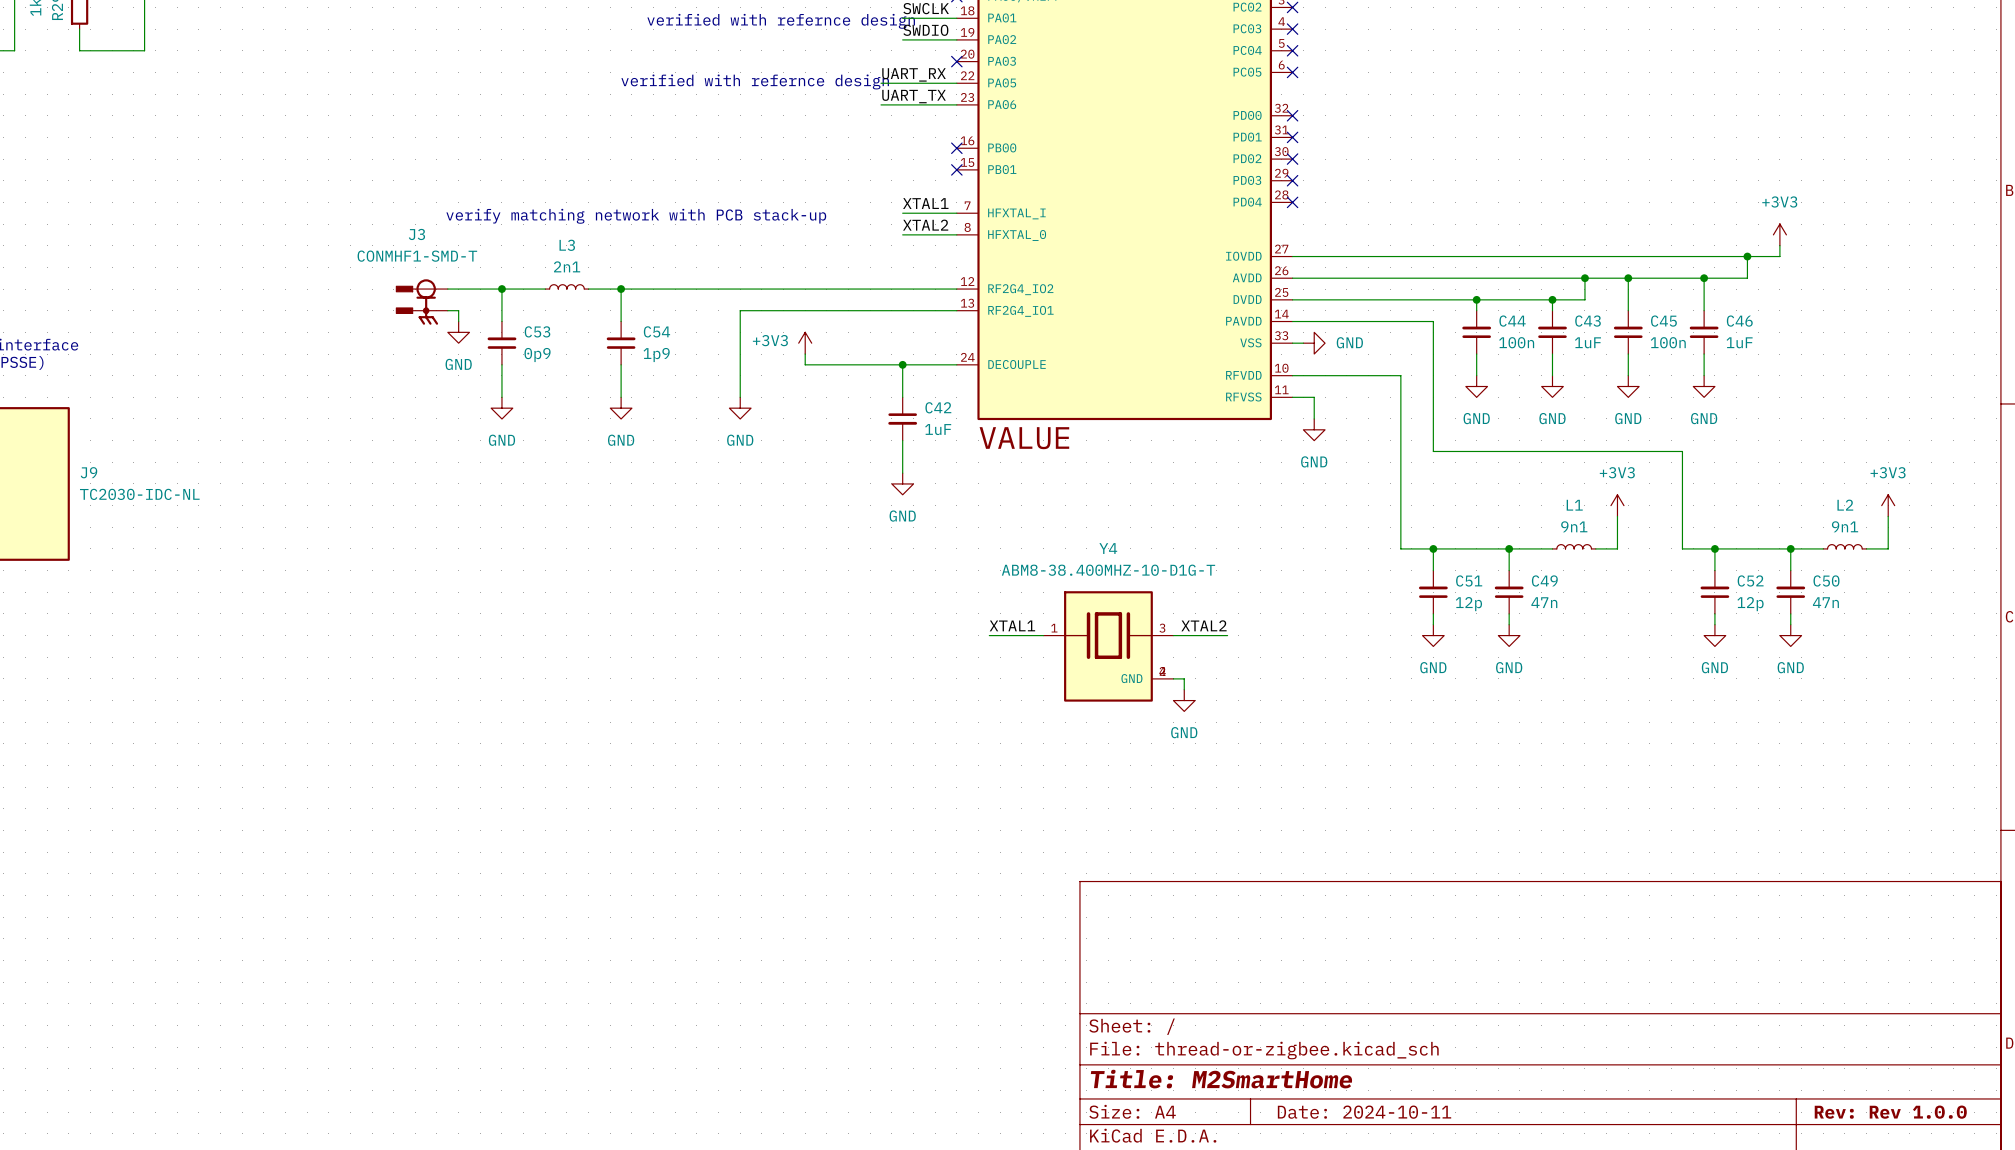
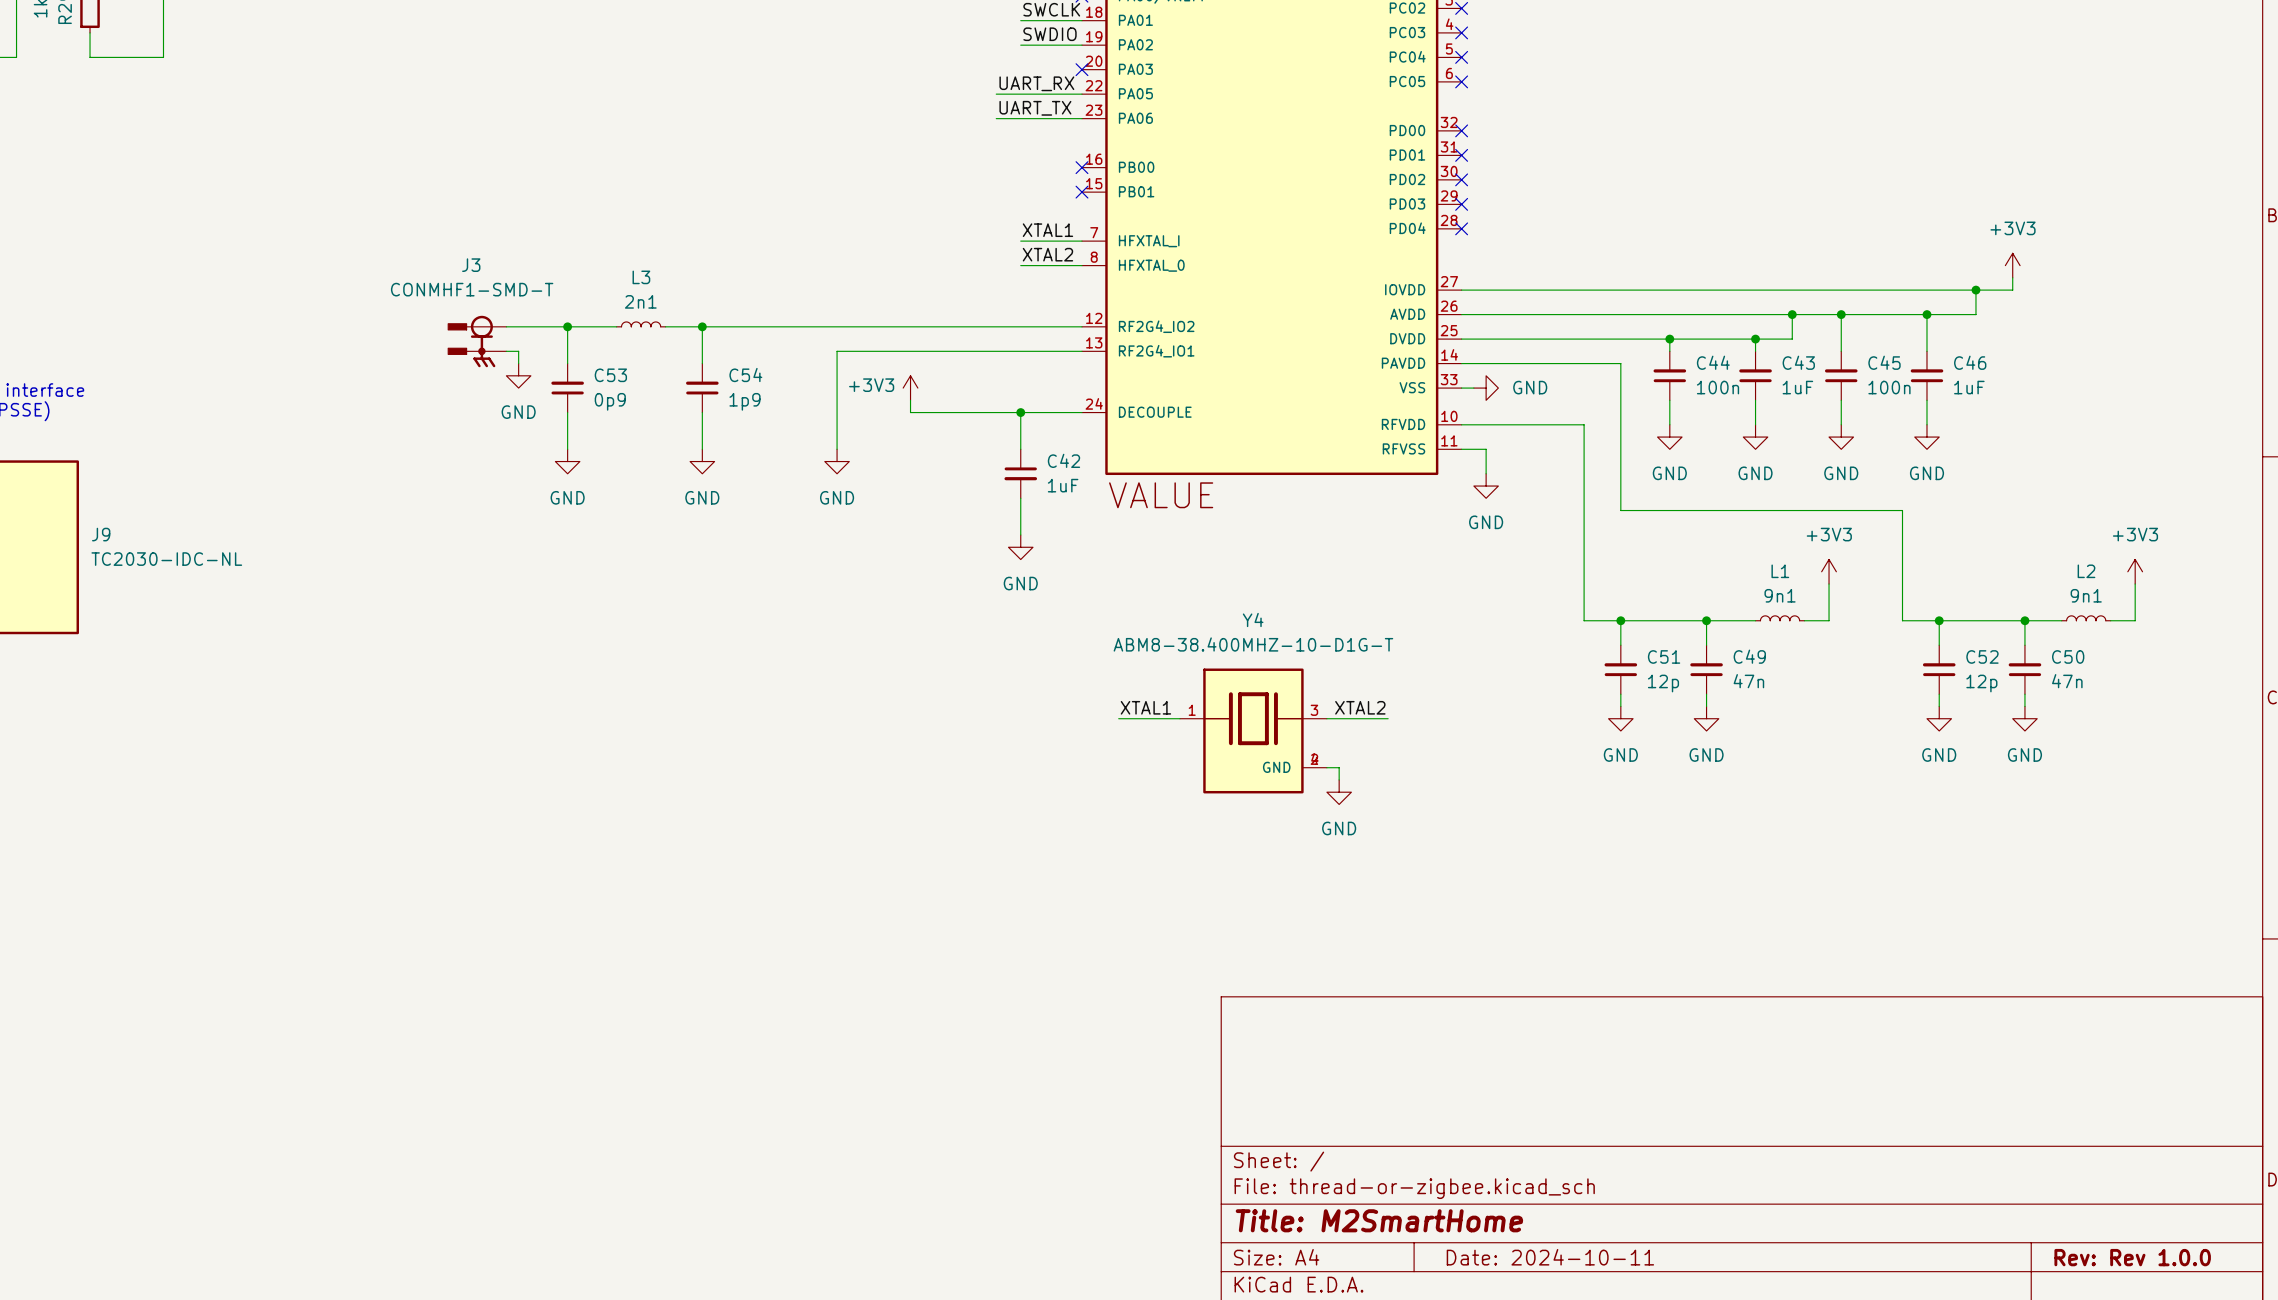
text: verified with refernce design (781, 21) -> none
text: verified with refernce design (755, 81) -> none
text: verify matching network with PCB stack-up (636, 216) -> none

